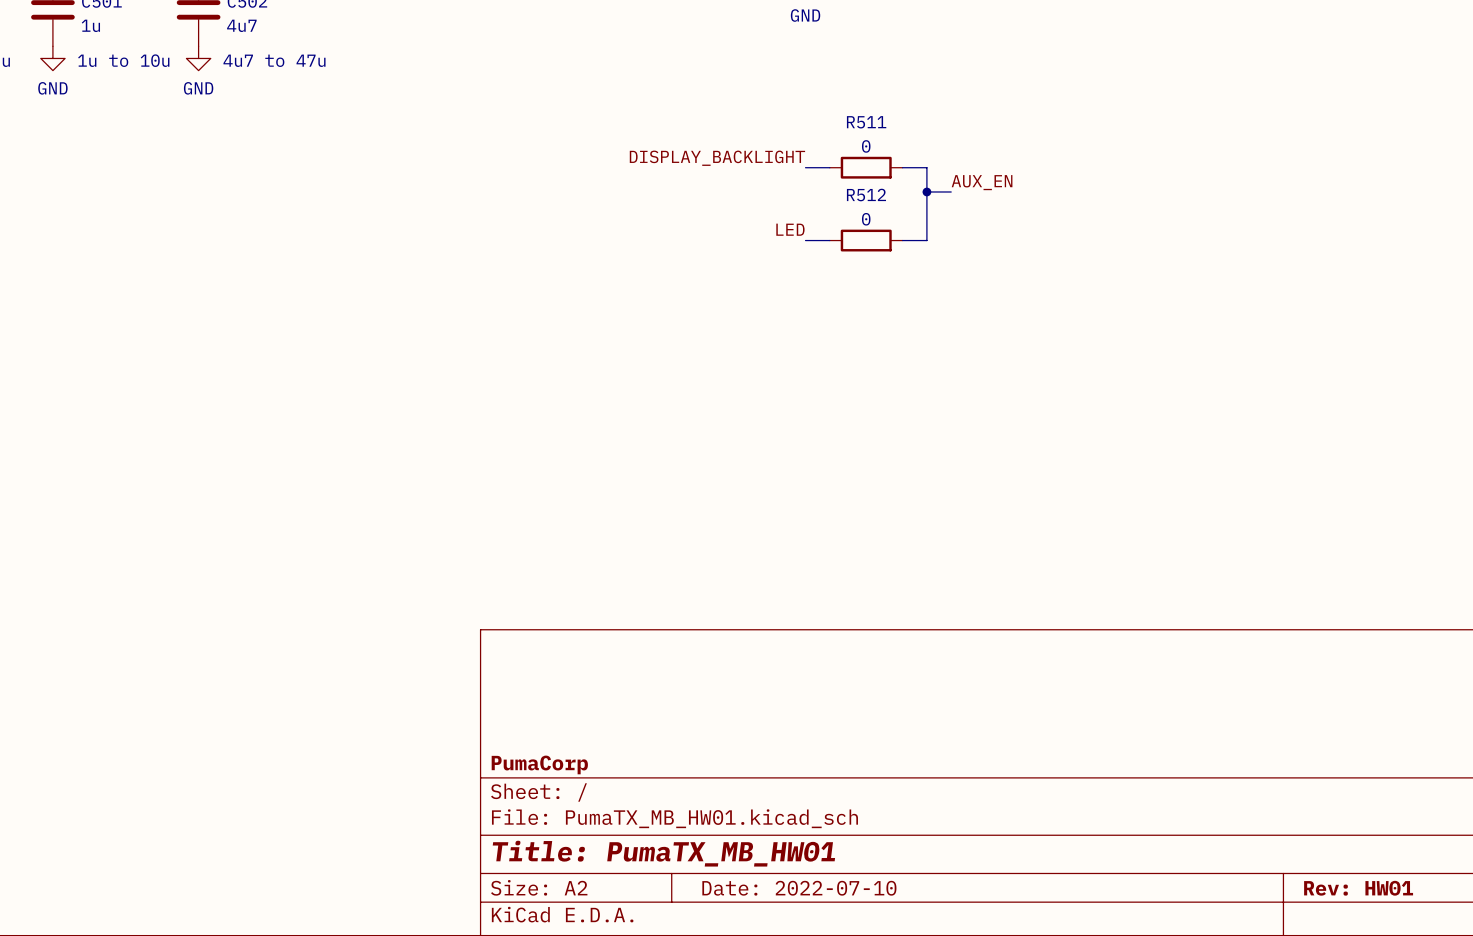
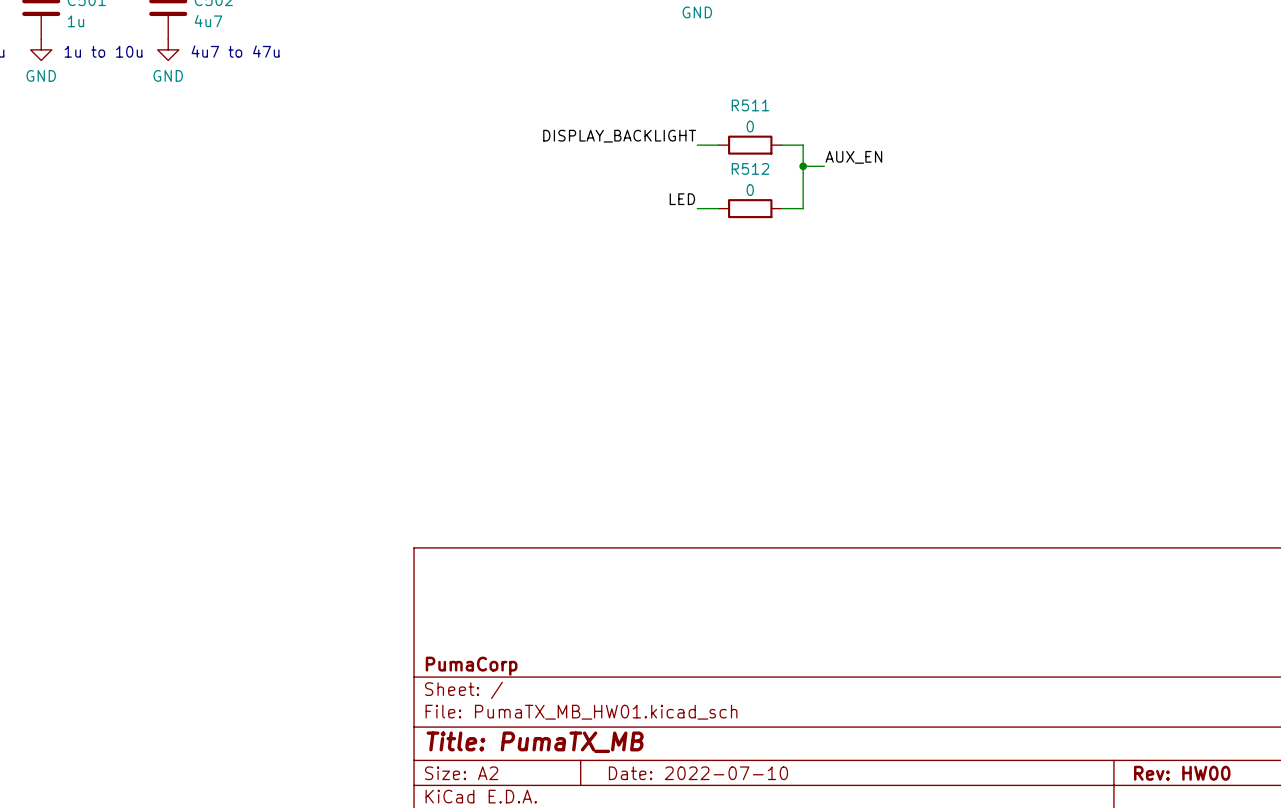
title block: Title: PumaTX_MB_HW01 (663, 853) -> Title: PumaTX_MB (535, 742)
title block: Rev: HW01 (1358, 888) -> Rev: HW00 (1182, 773)

